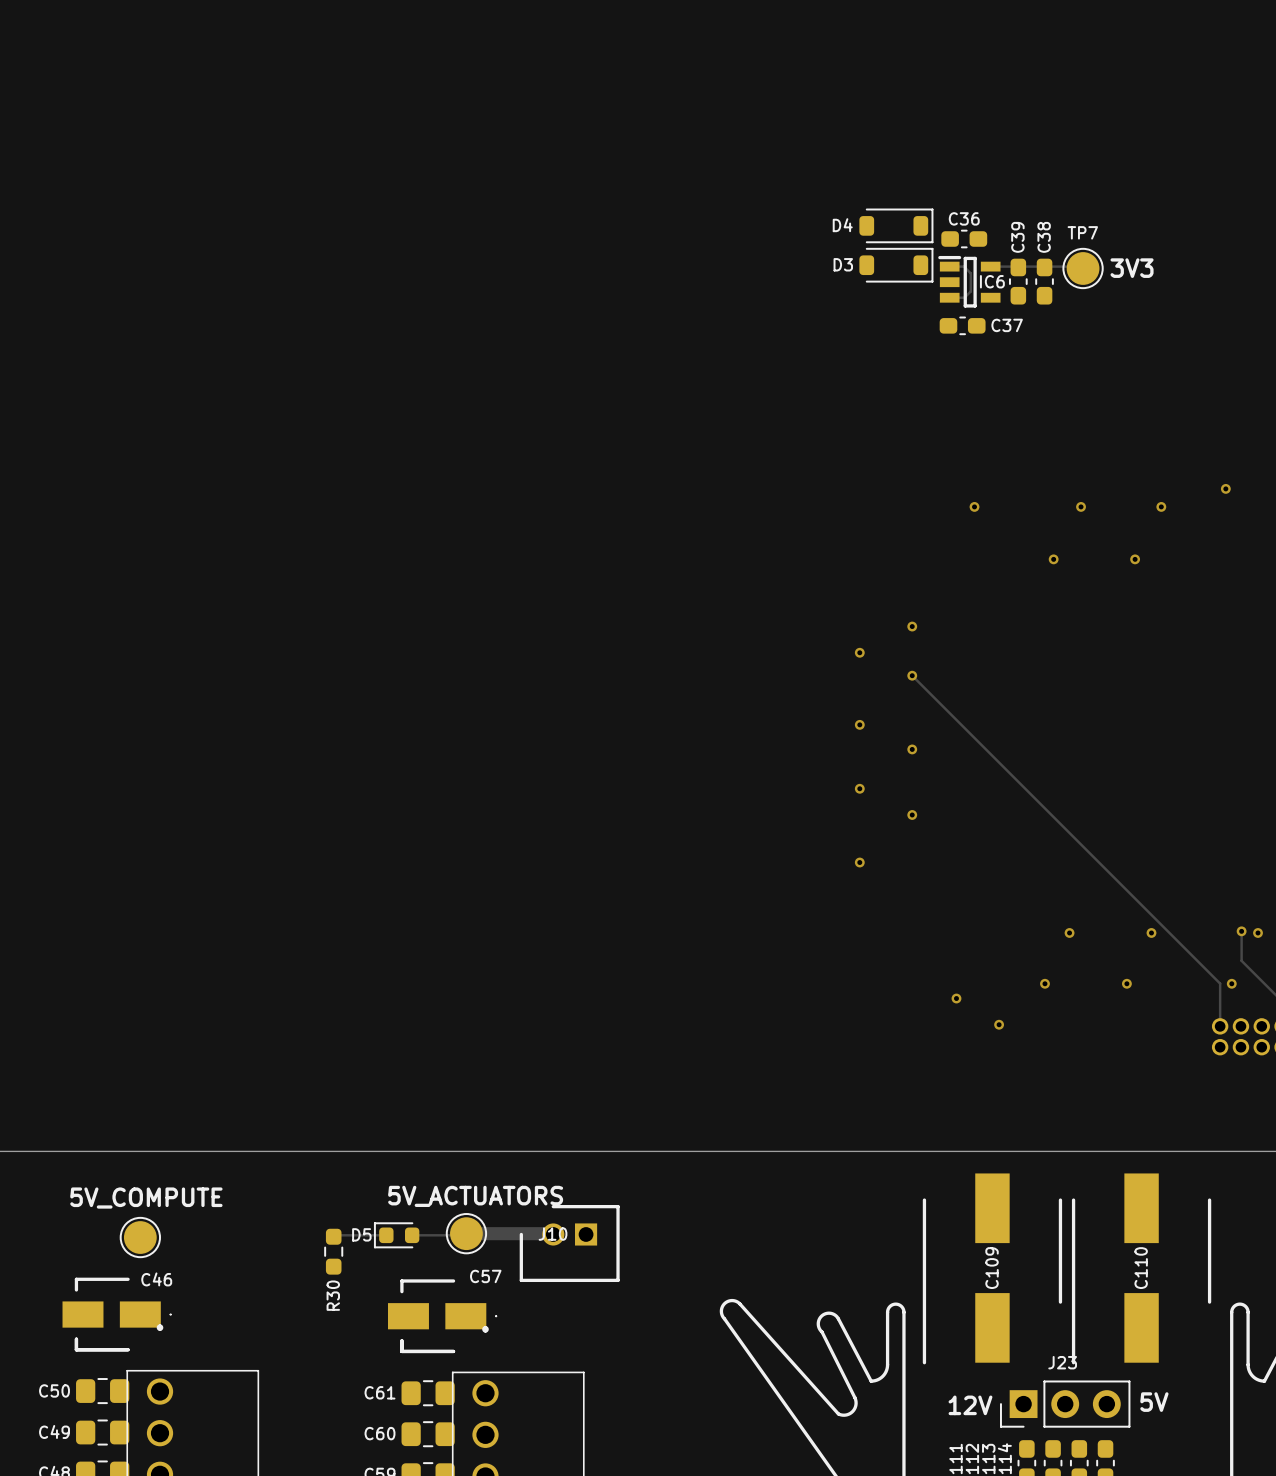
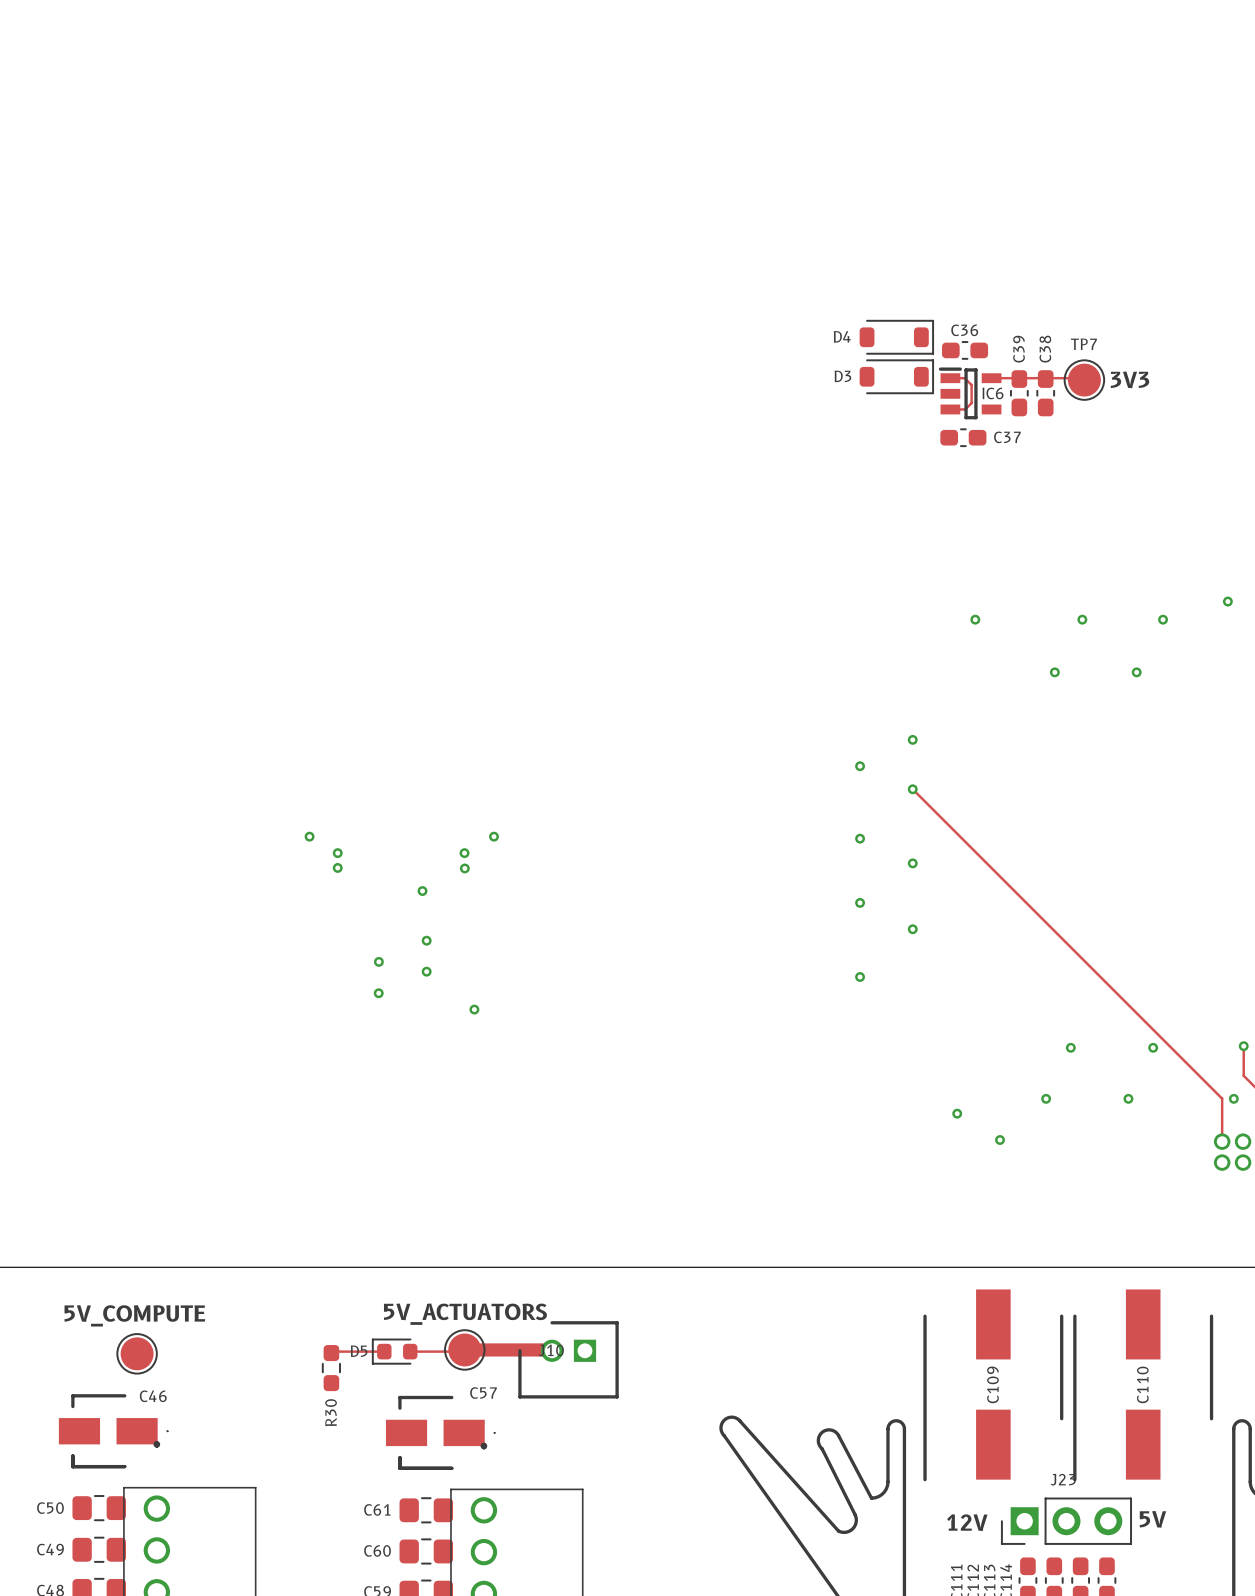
via: none -> (309, 836)
via: none -> (494, 836)
via: none -> (337, 853)
via: none -> (464, 853)
via: none -> (337, 867)
via: none -> (464, 868)
via: none -> (422, 891)
via: none -> (426, 940)
via: none -> (378, 961)
via: none -> (426, 971)
via: none -> (378, 993)
via: none -> (474, 1009)

